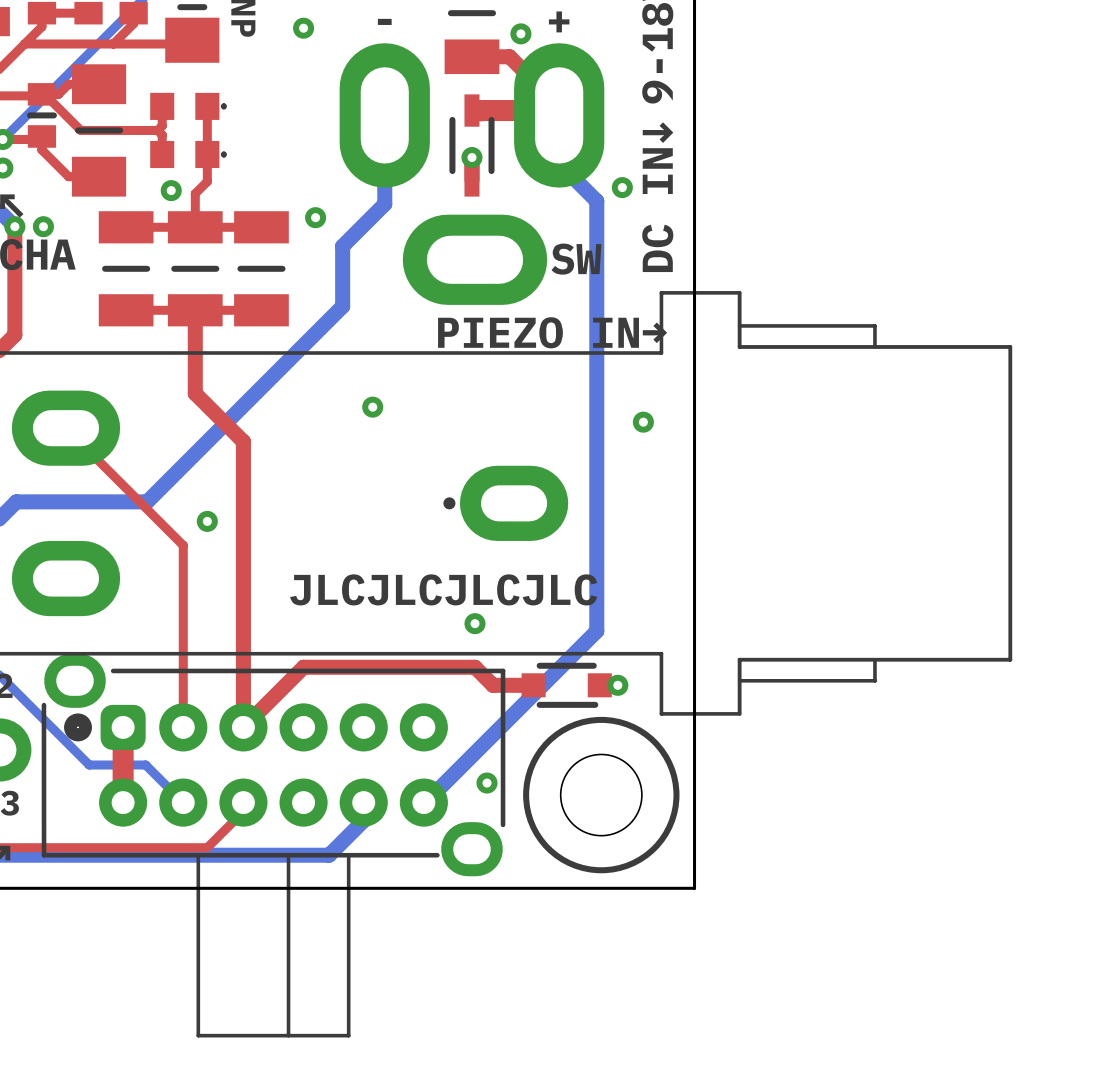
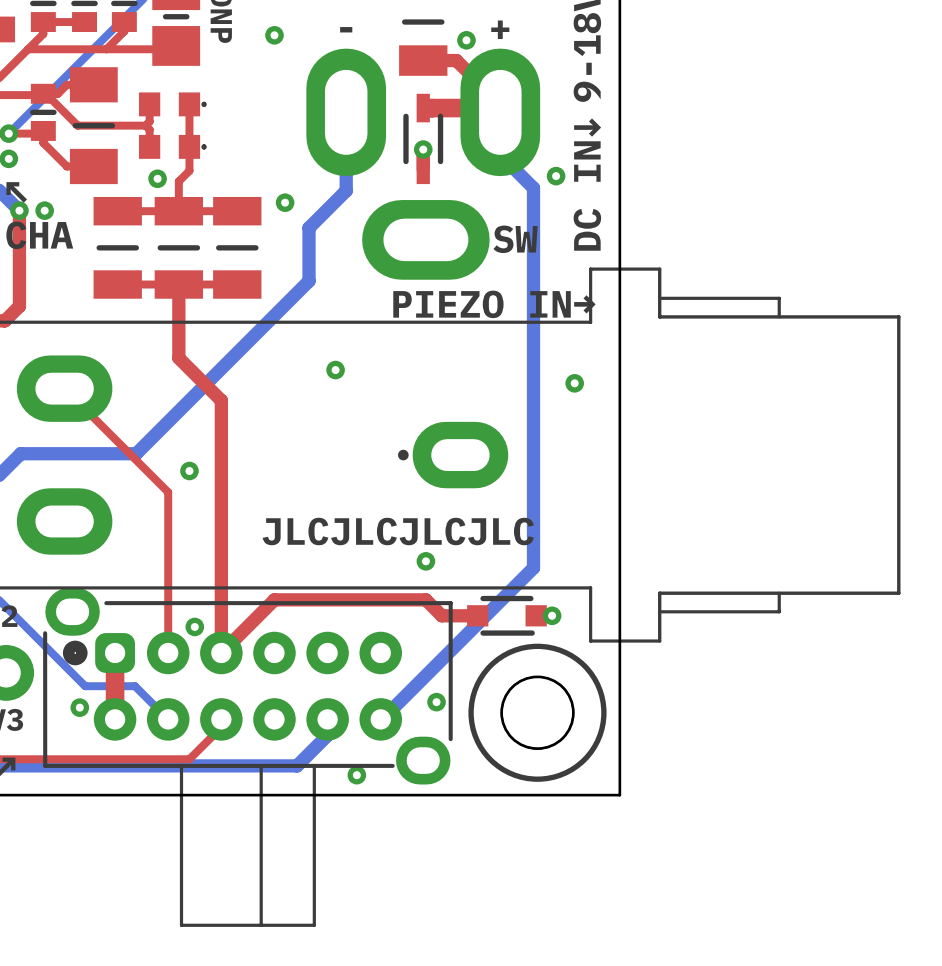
via: none -> (194, 626)
round board edge: none -> [500, 675, 575, 750]
via: none -> (79, 707)
via: none -> (356, 775)

